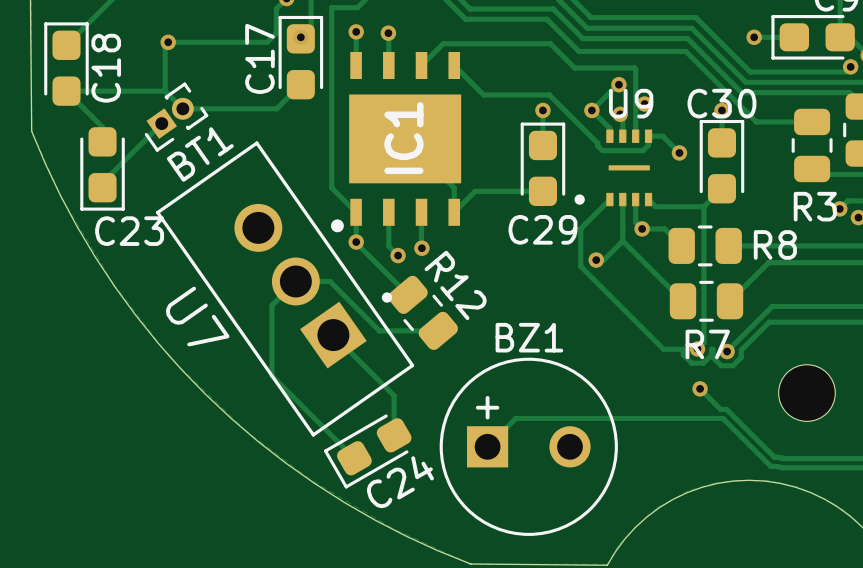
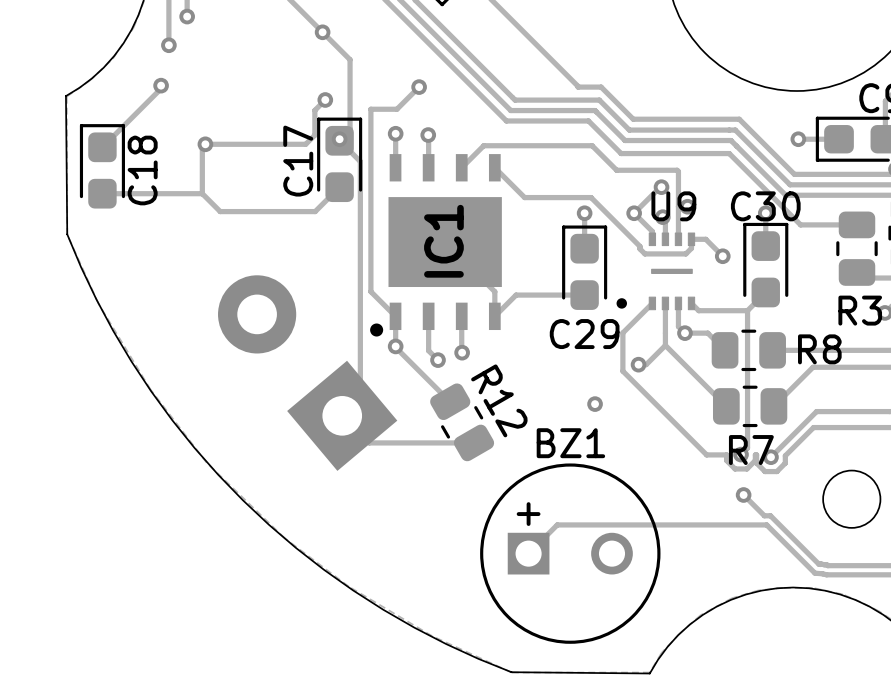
track: none -> (339, 140) (360, 161) (360, 397) (342, 415) (369, 442) (474, 442)
track: (66, 91) (102, 127) (102, 141) -> none
BT1: (176, 117) -> none
track: (161, 123) (102, 182) (102, 187) -> none
C23: (102, 168) -> none
part: none -> (307, 373)
U7: (285, 289) -> none
via: none -> (595, 404)
R12 rotation: 0° (423, 312) -> 10° clockwise (462, 422)
track: (438, 330) (379, 330) (330, 281) (295, 281) (271, 305) (271, 375) (354, 458) -> none
track: (333, 335) (394, 395) (394, 435) -> none
C24: (367, 451) -> none

